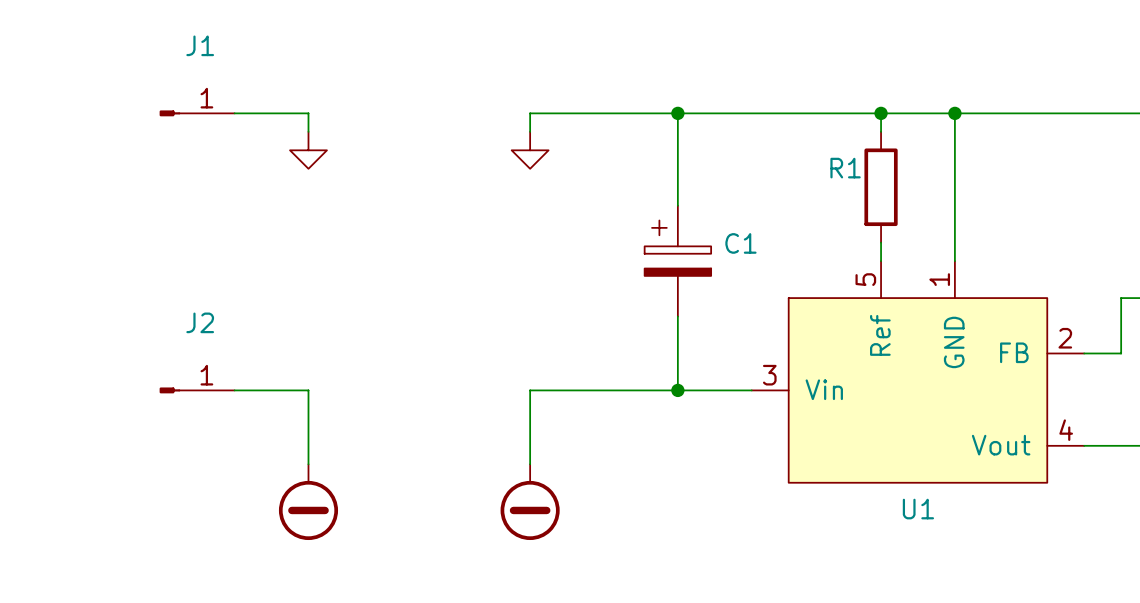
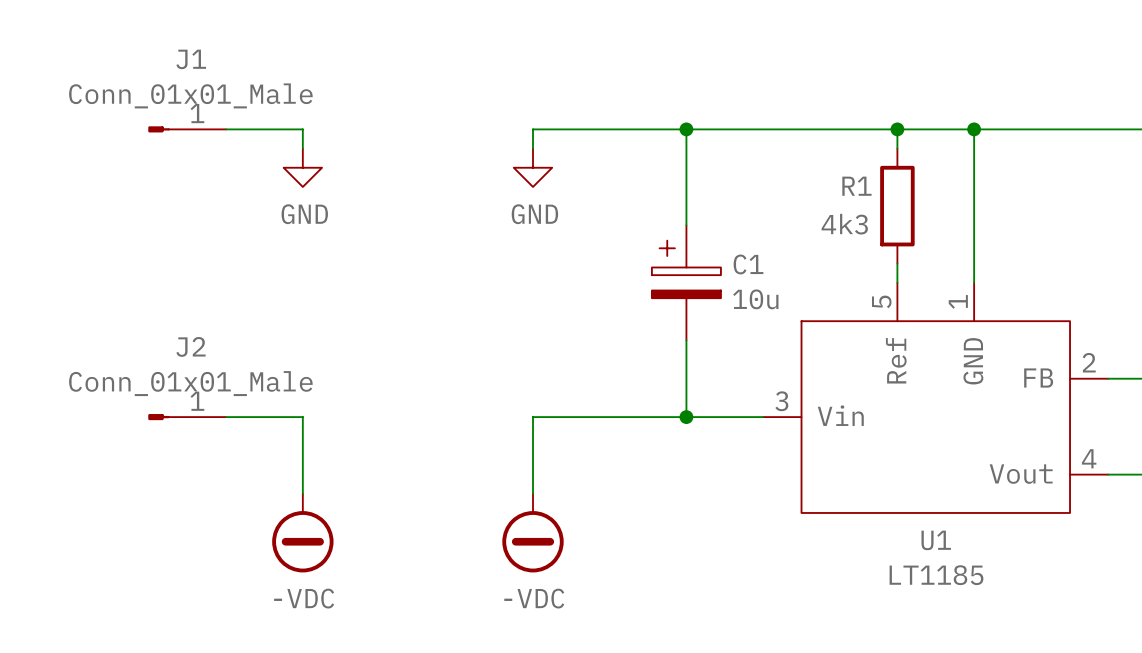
J1 value: none -> Conn_01x01_Male (190, 95)
power symbol text: none -> GND (304, 214)
power symbol text: none -> GND (534, 214)
R1 value: none -> 4k3 (844, 224)
C1 value: none -> 10u (755, 299)
J2 value: none -> Conn_01x01_Male (190, 383)
U1 value: none -> LT1185 (936, 575)
power symbol text: none -> -VDC (304, 598)
power symbol text: none -> -VDC (534, 598)

